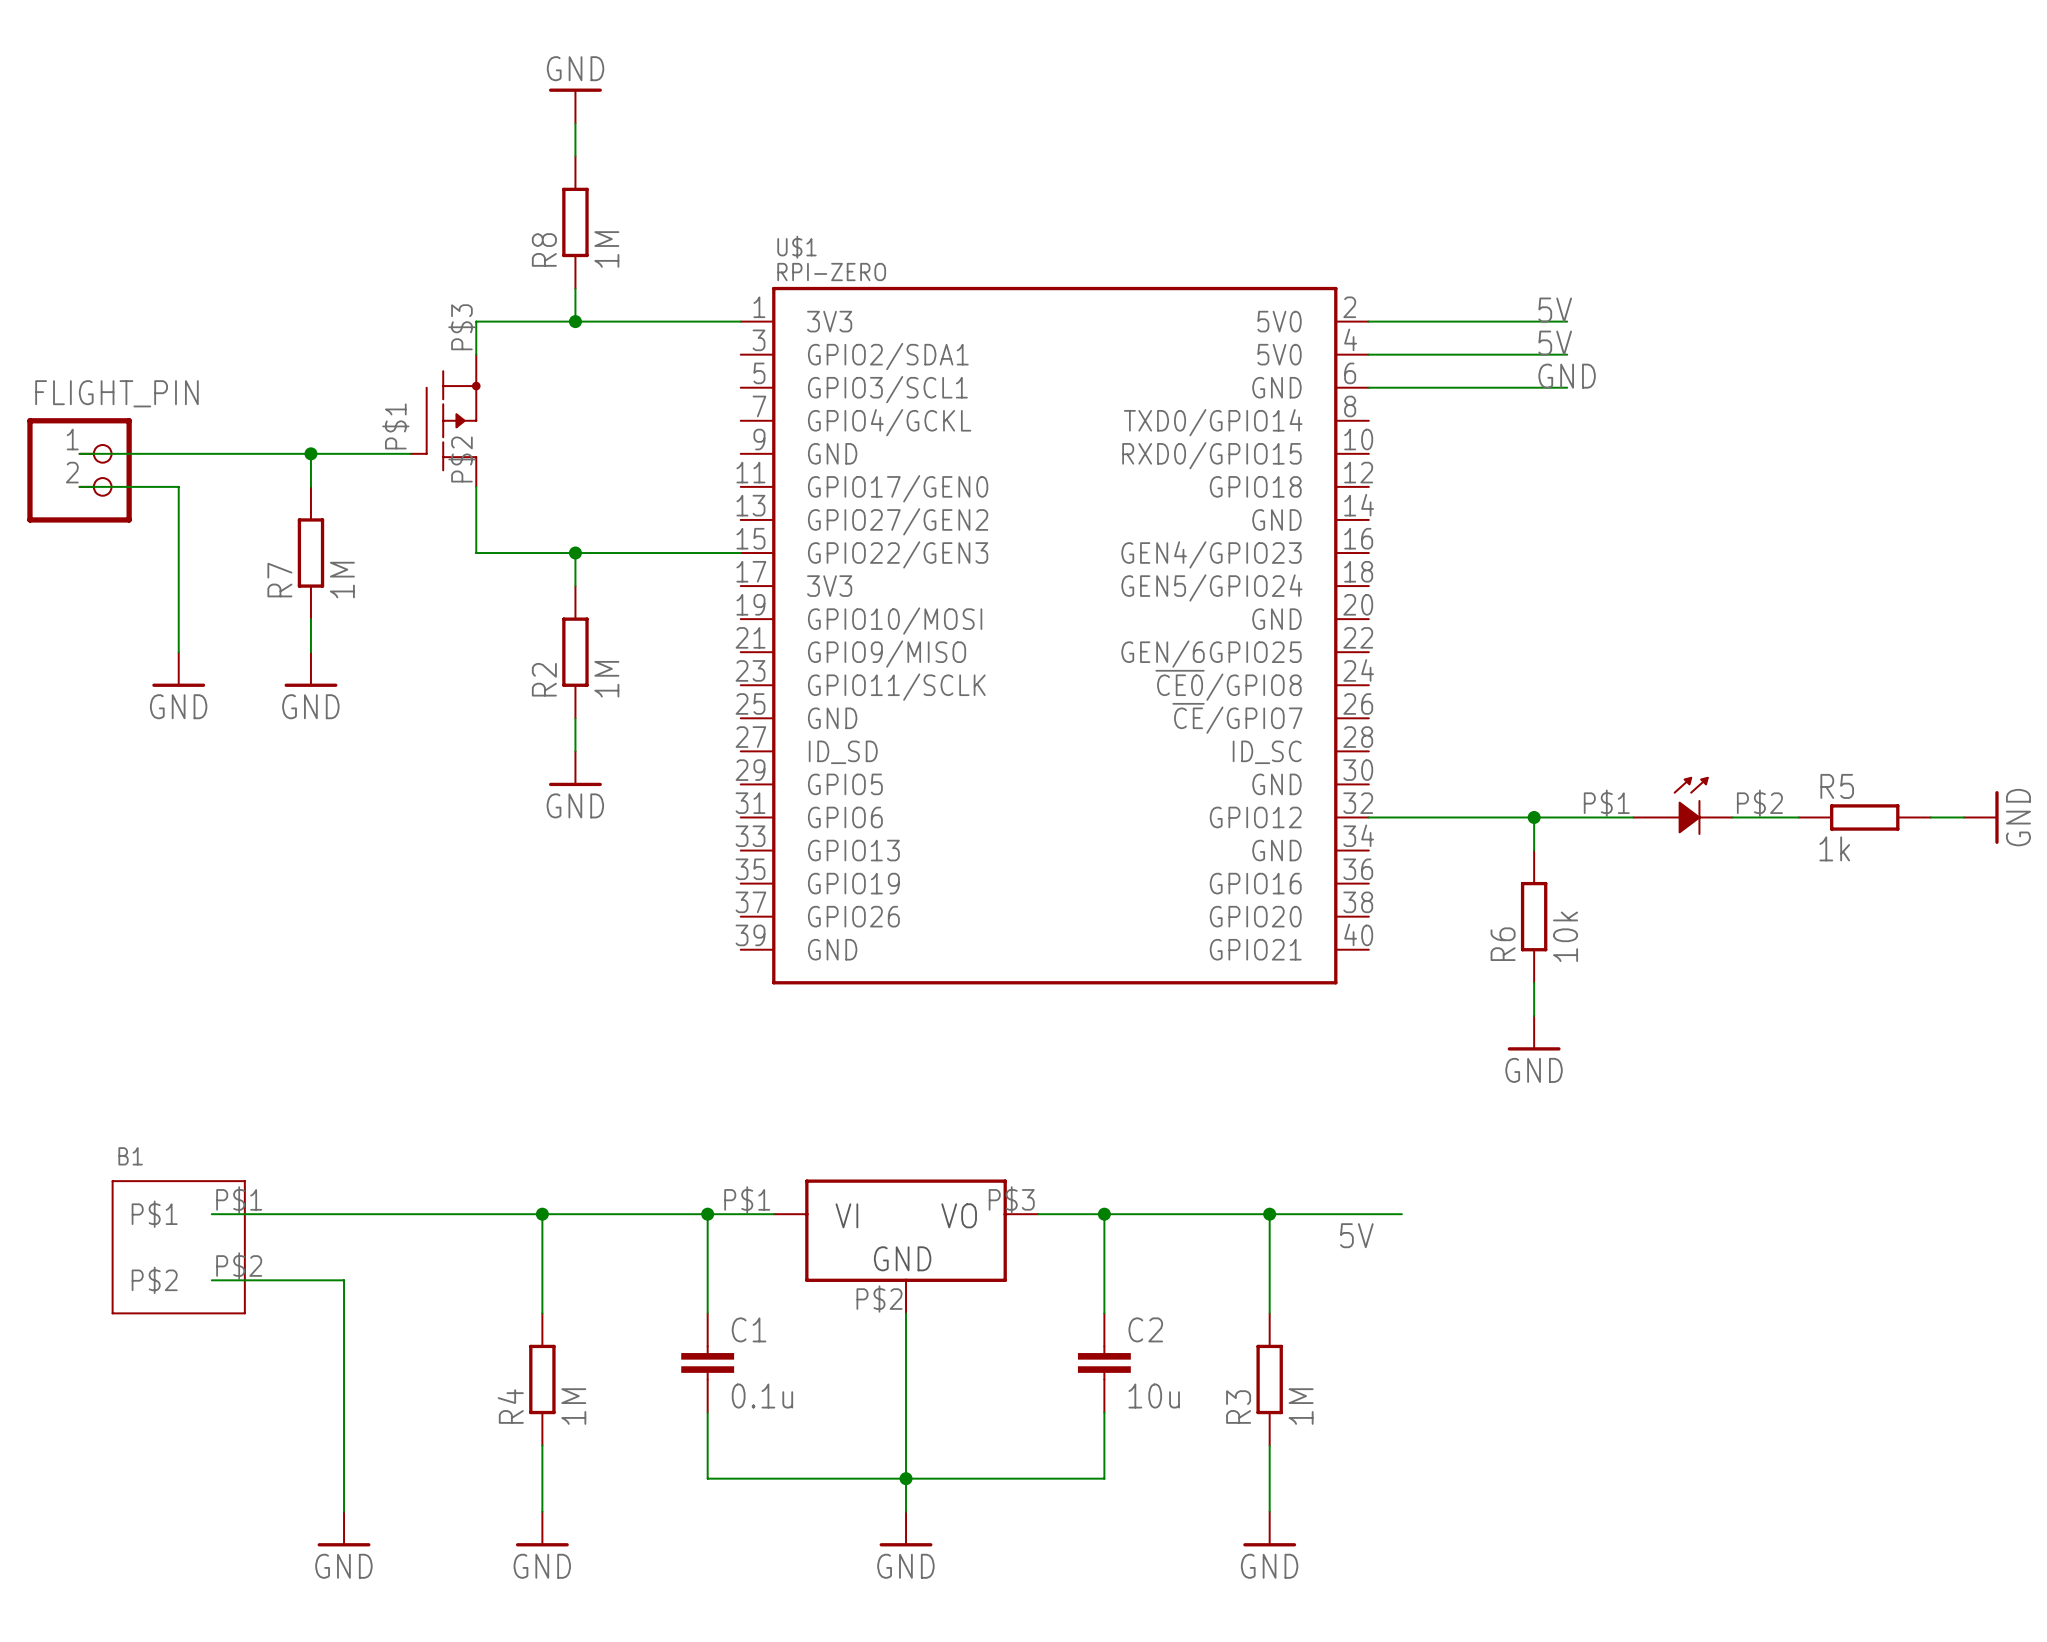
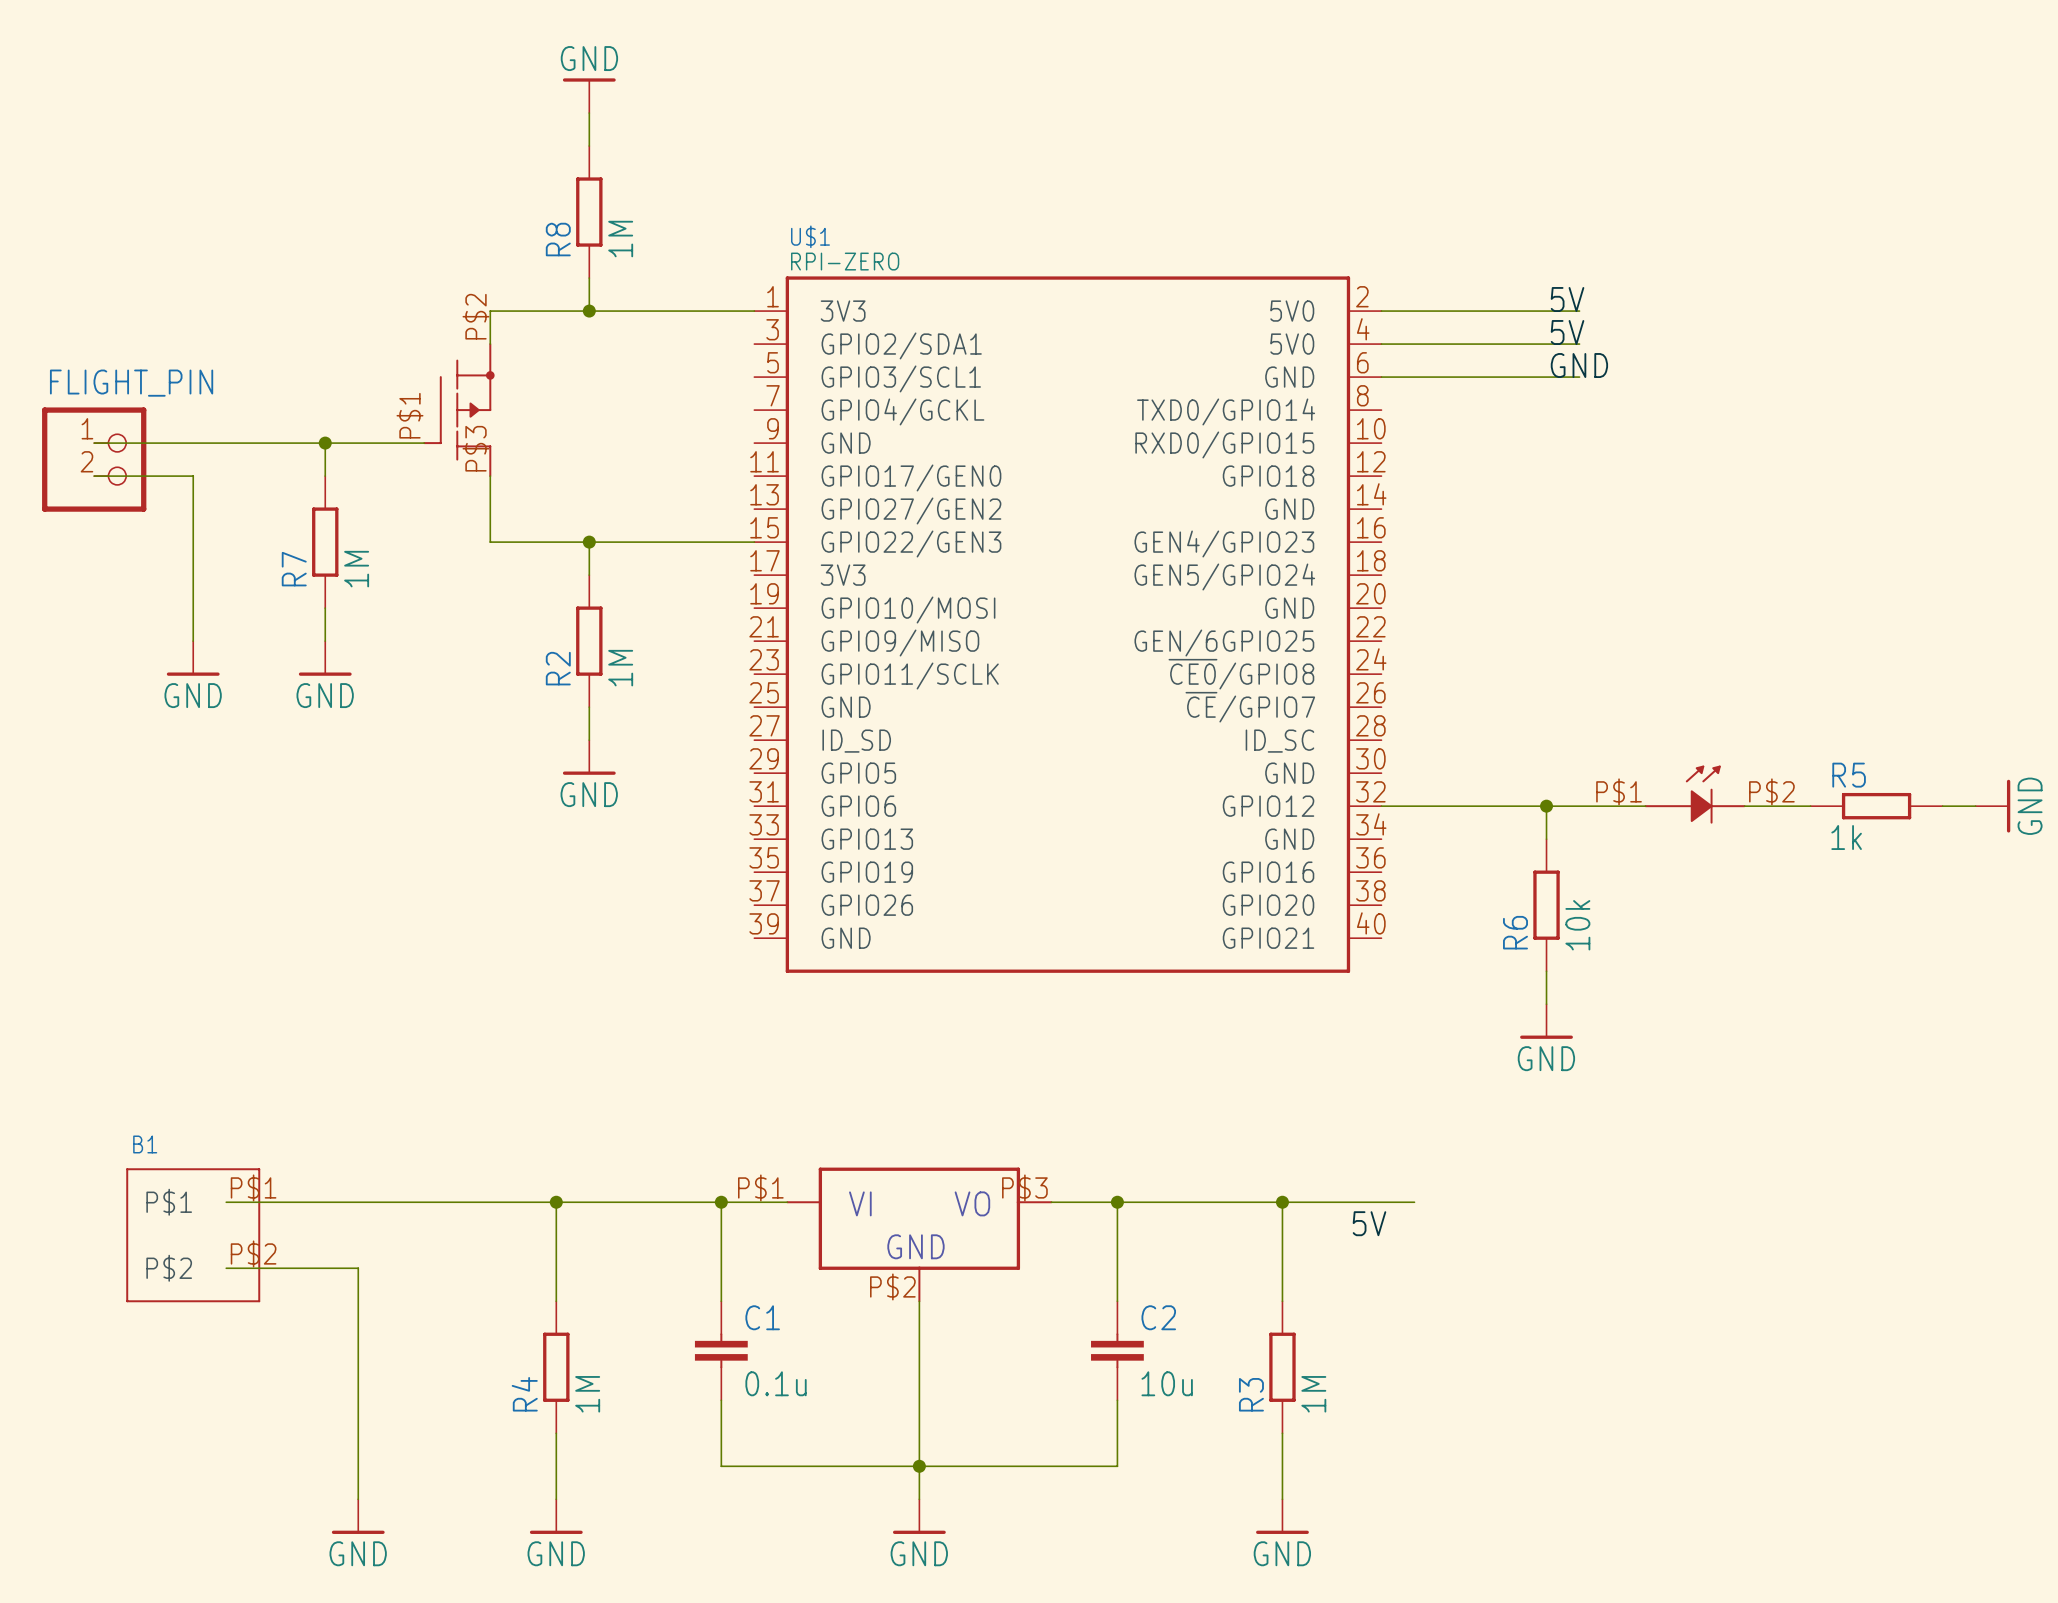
part pin number: P$3 (461, 327) -> P$2 (476, 316)
part pin number: P$2 (461, 459) -> P$3 (476, 448)

